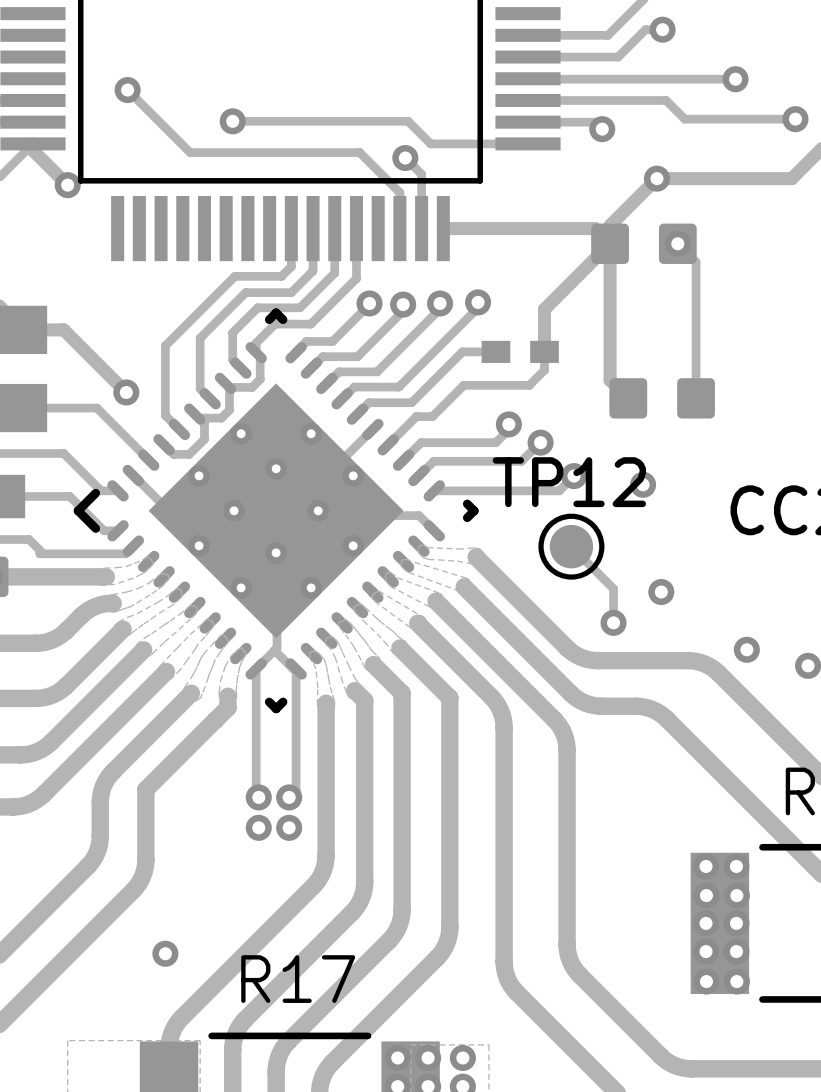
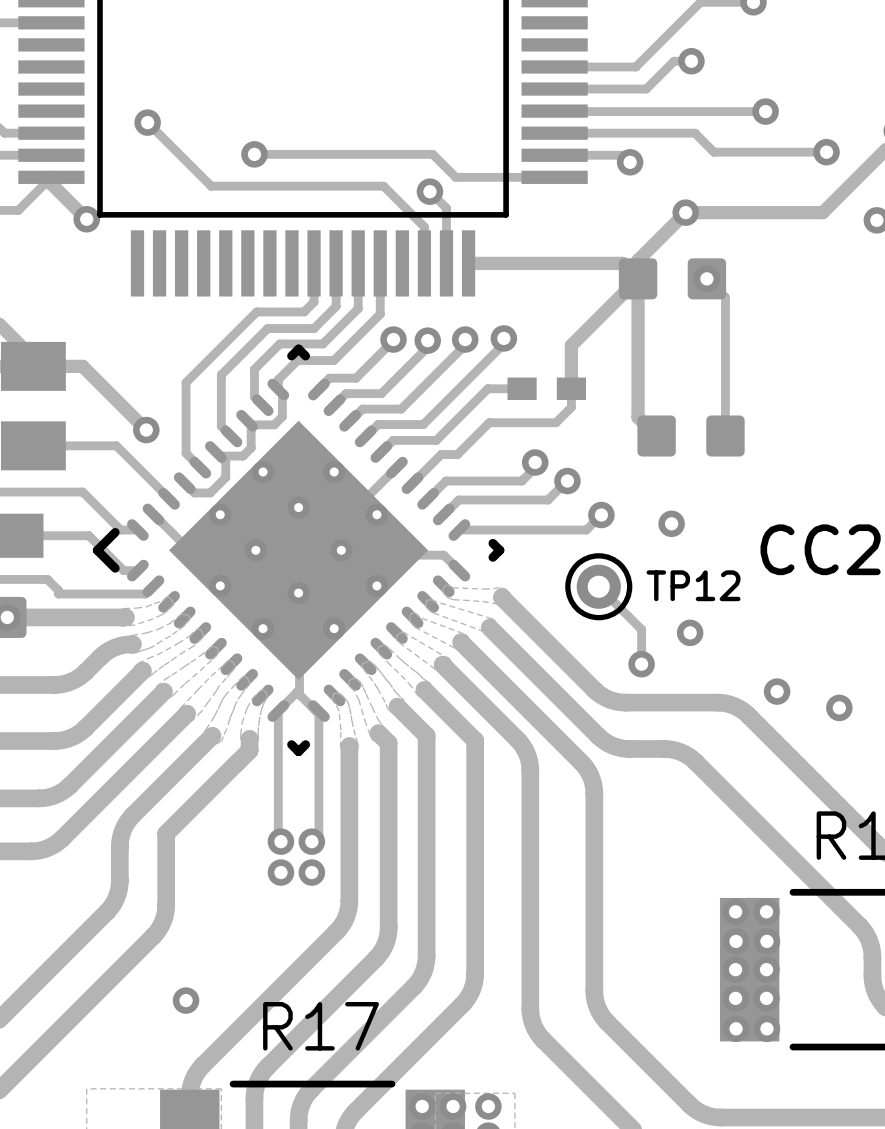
TP12: (571, 546) -> none
part: none -> (598, 586)

